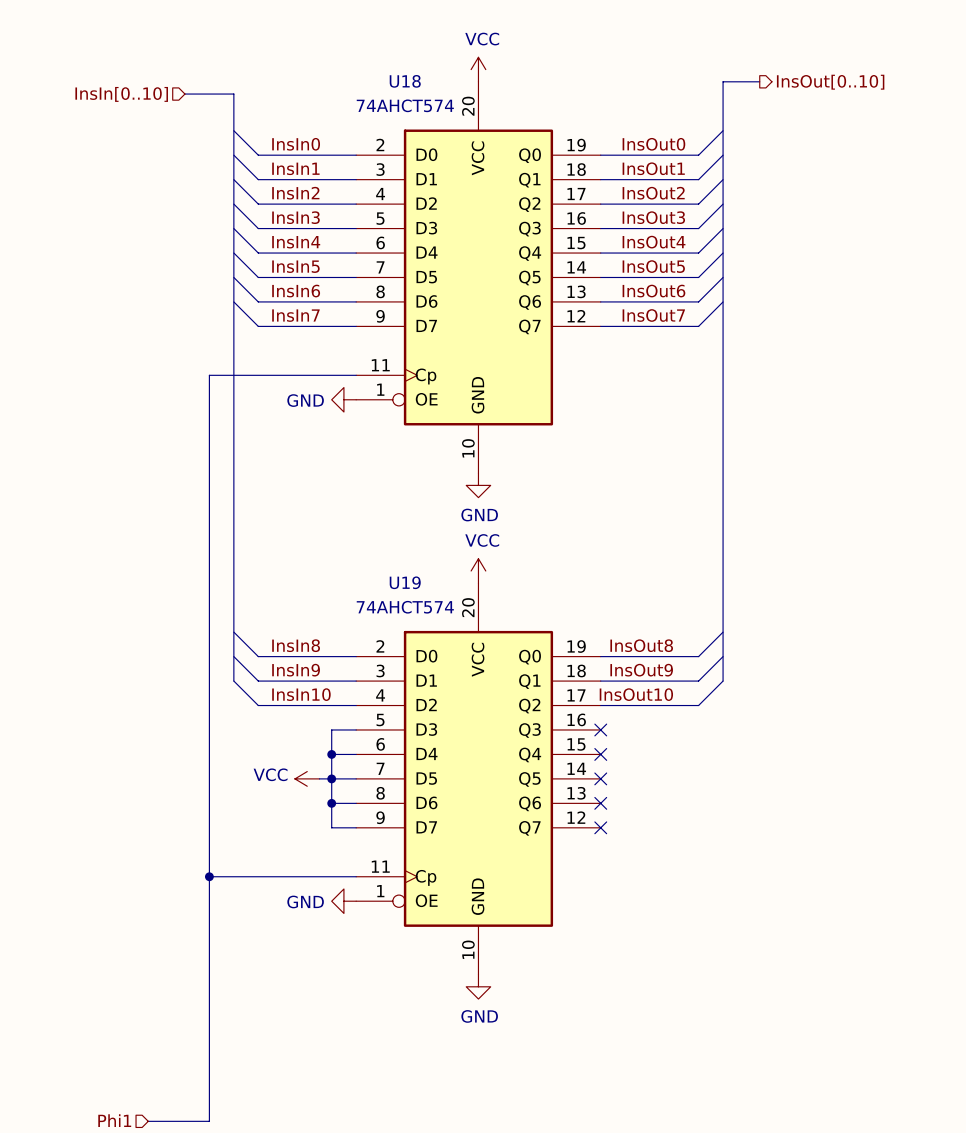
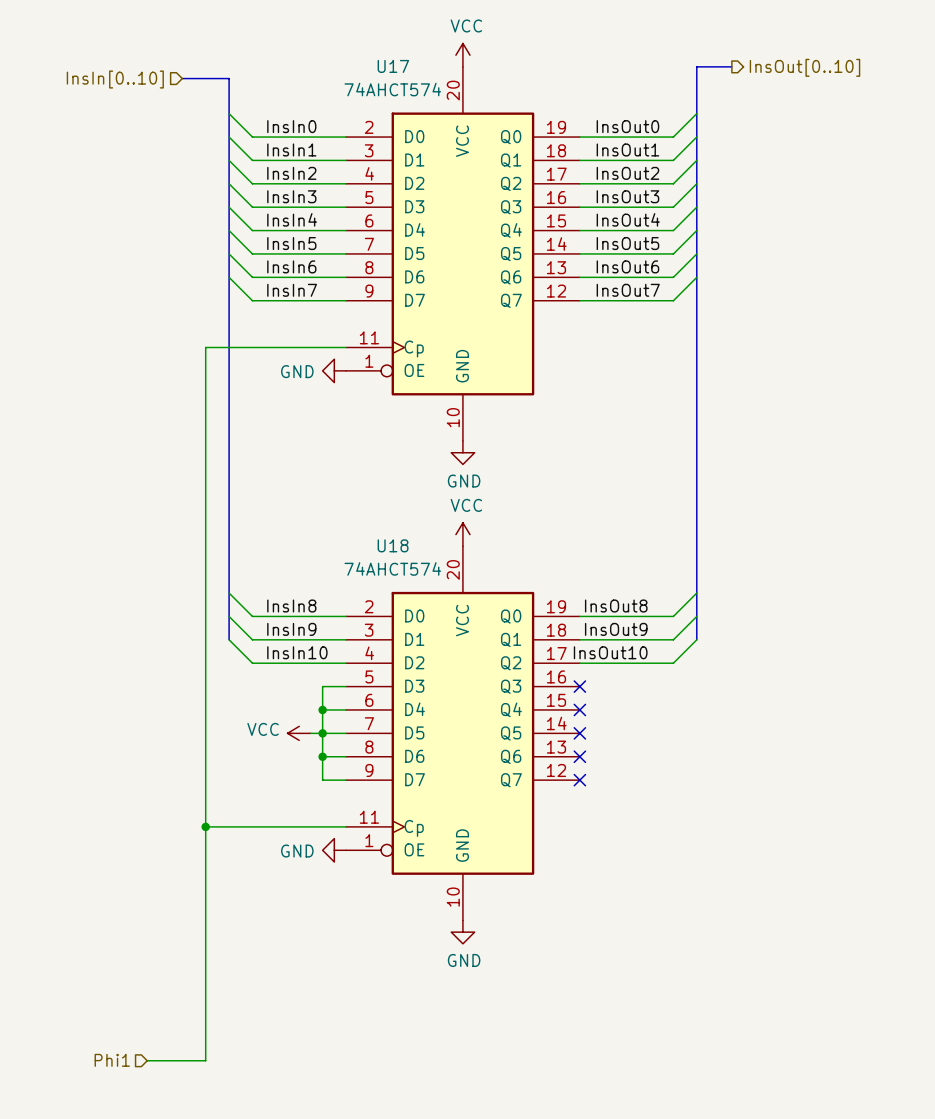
U18 name: U18 (405, 81) -> U17 (393, 66)
U19 name: U19 (405, 582) -> U18 (393, 545)

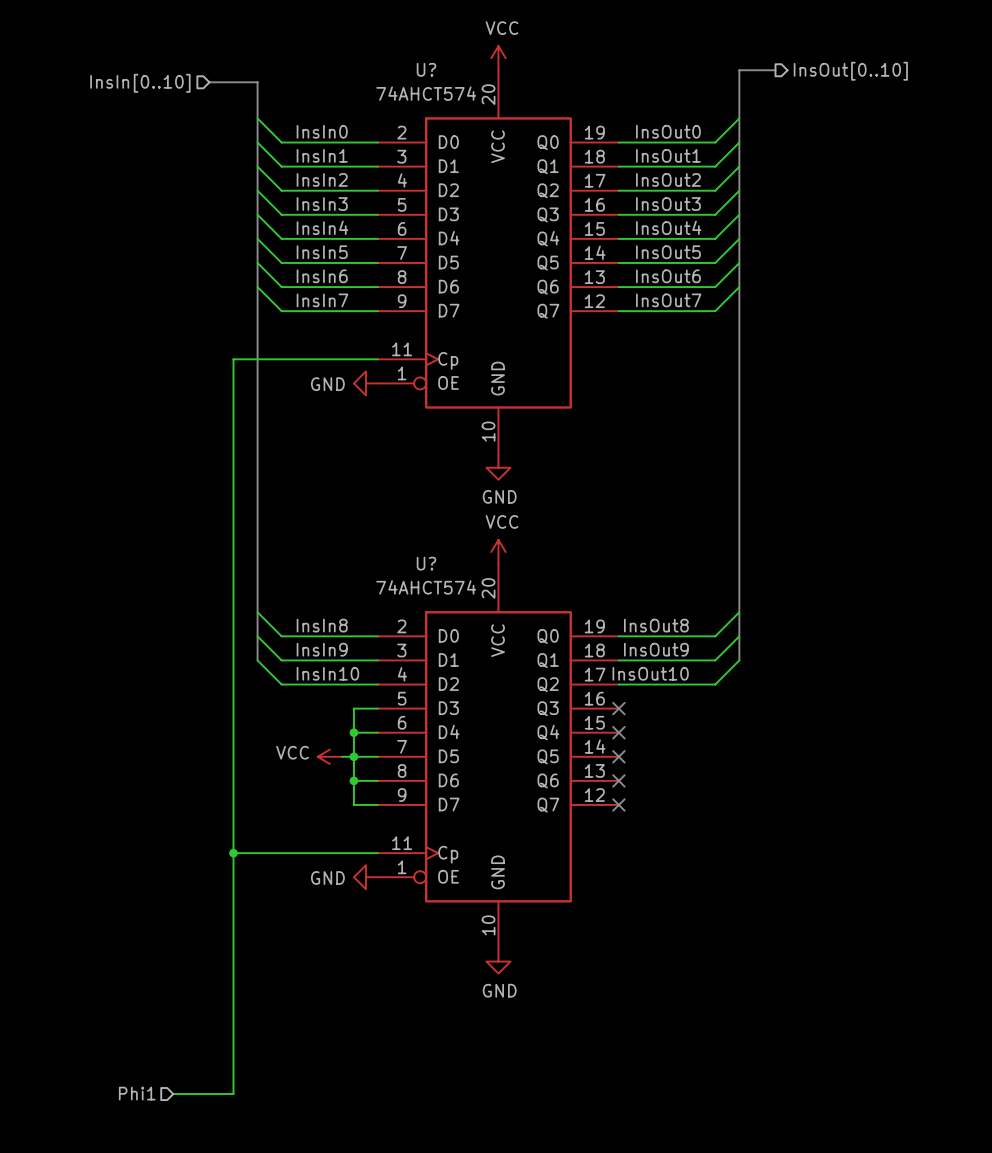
U17 name: U17 (393, 66) -> U? (426, 69)
U18 name: U18 (393, 545) -> U? (426, 563)

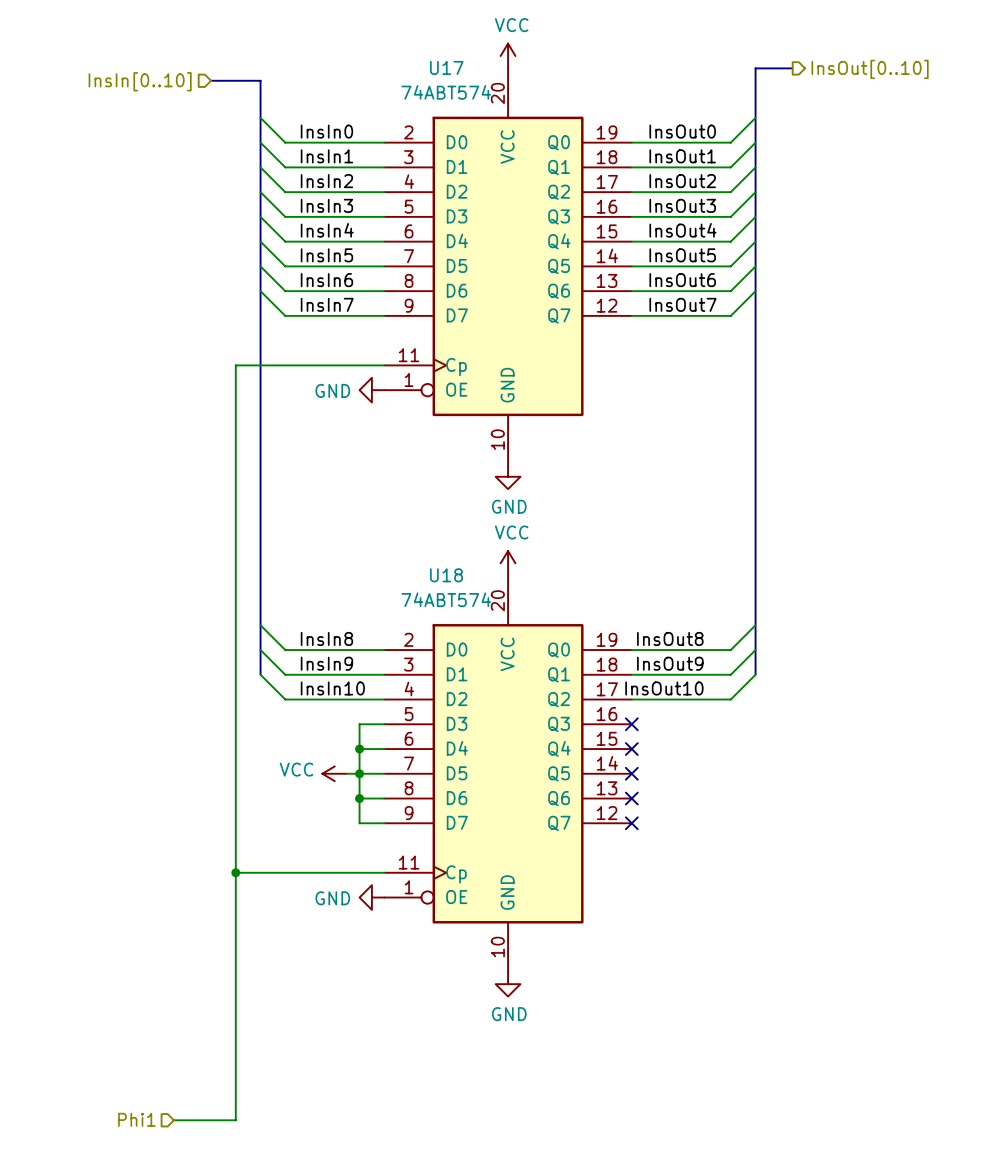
U? name: U? (426, 69) -> U17 (446, 67)
U? value: 74AHCT574 (426, 93) -> 74ABT574 (446, 92)
U? name: U? (426, 563) -> U18 (446, 575)
U? value: 74AHCT574 (426, 587) -> 74ABT574 (446, 599)

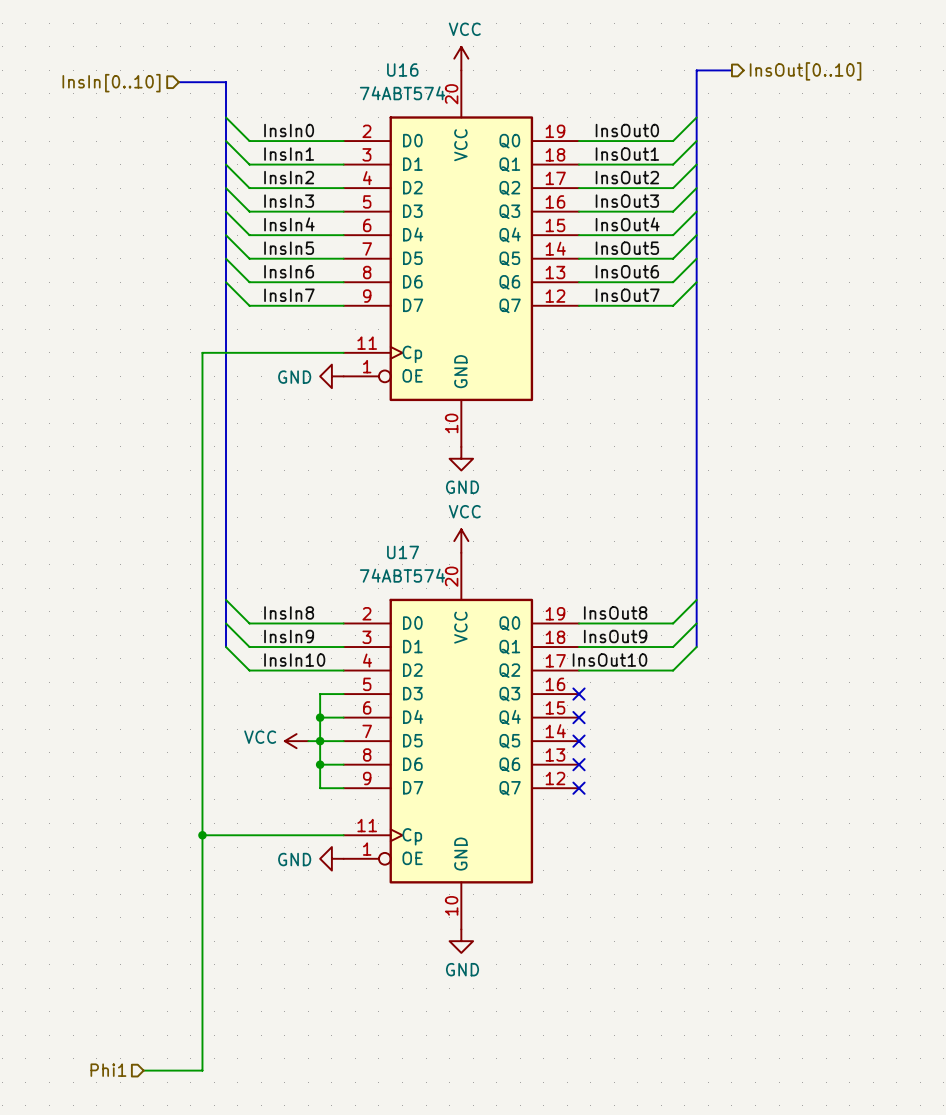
U17 name: U17 (446, 67) -> U16 (402, 69)
U18 name: U18 (446, 575) -> U17 (403, 552)

